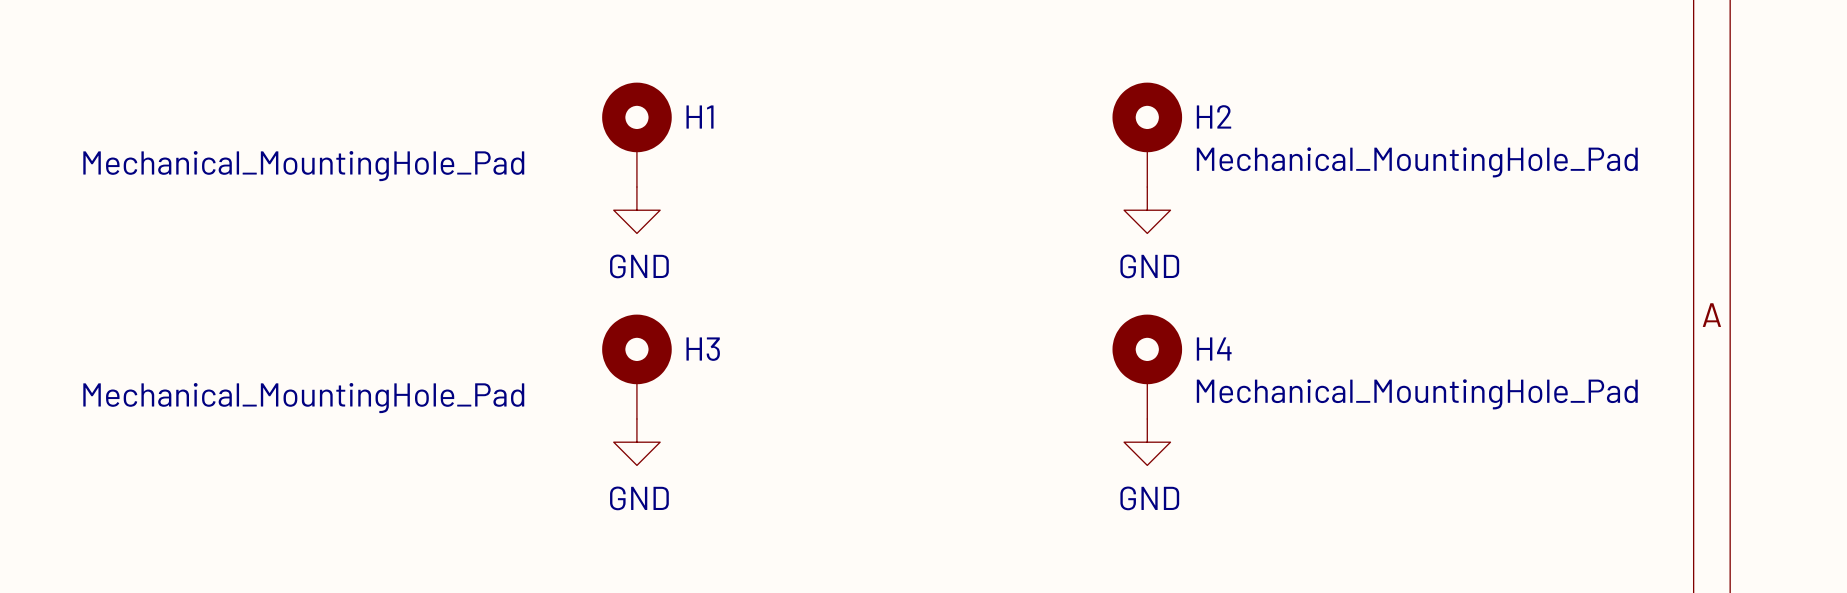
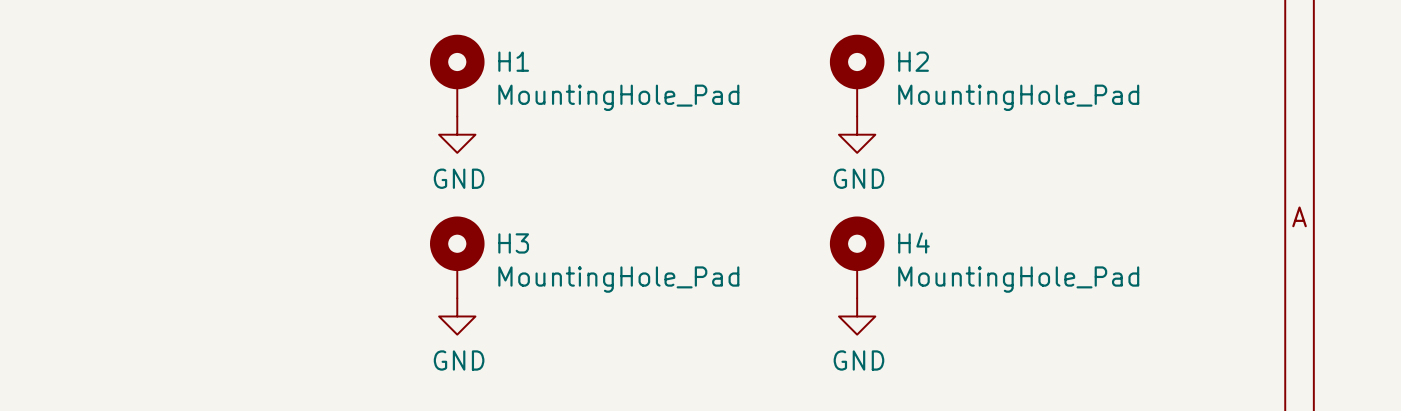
H2 value: Mechanical_MountingHole_Pad (1417, 162) -> MountingHole_Pad (1018, 97)
H1 value: Mechanical_MountingHole_Pad (303, 166) -> MountingHole_Pad (618, 97)
H4 value: Mechanical_MountingHole_Pad (1417, 394) -> MountingHole_Pad (1018, 279)
H3 value: Mechanical_MountingHole_Pad (303, 398) -> MountingHole_Pad (618, 279)

